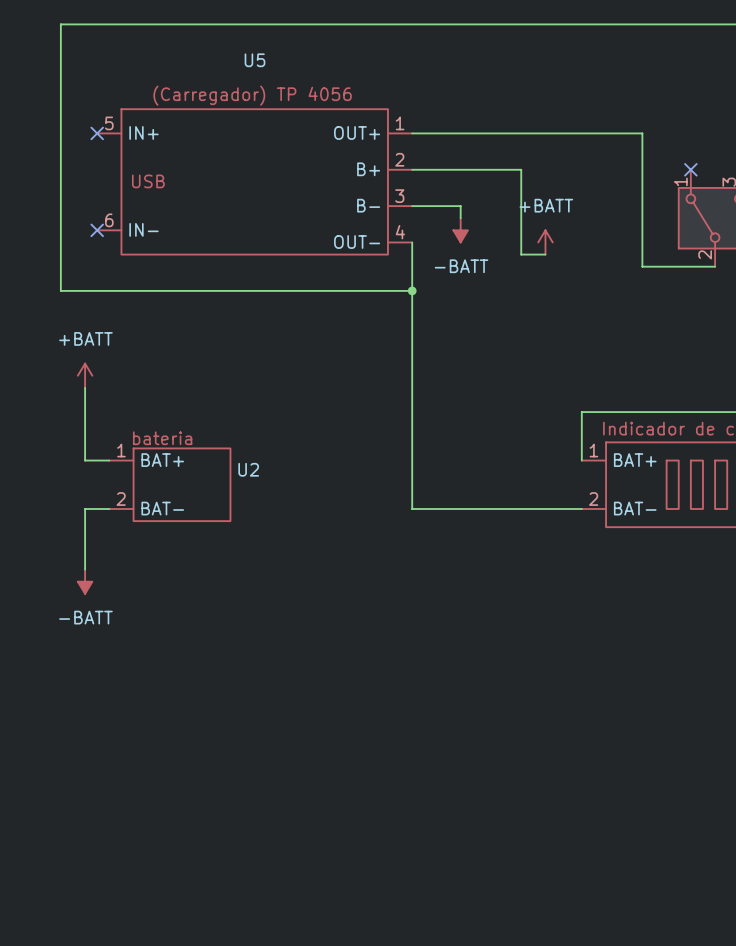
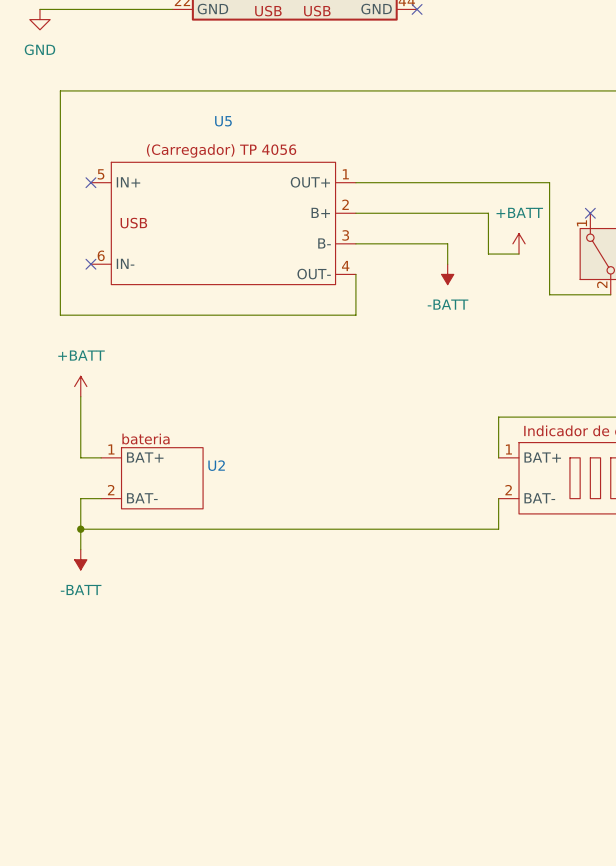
wire: (521, 169) (521, 206) -> (447, 213) (488, 213) (488, 254) (519, 254)
wire: (460, 206) (460, 218) -> (396, 243) (447, 243)
power symbol position: -BATT (460, 230) -> -BATT (447, 274)
wire: (521, 230) (521, 254) (545, 254) -> none
power symbol position: +BATT (545, 242) -> +BATT (519, 243)
wire: (412, 290) (412, 509) (581, 509) -> (80, 529) (498, 529) (498, 498)
junction: (412, 290) -> none
junction: none -> (80, 529)

